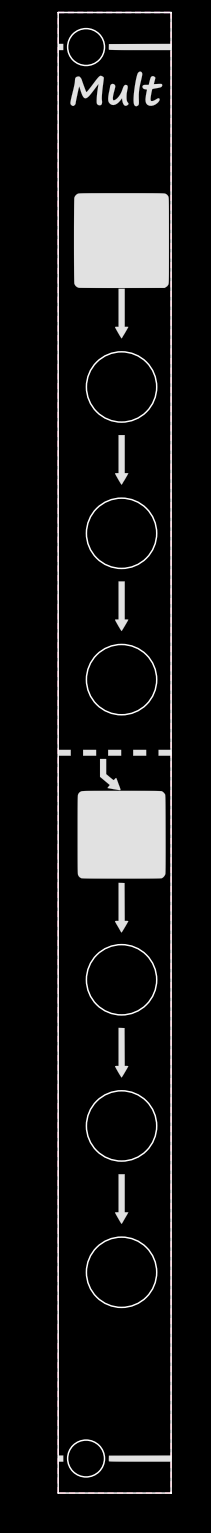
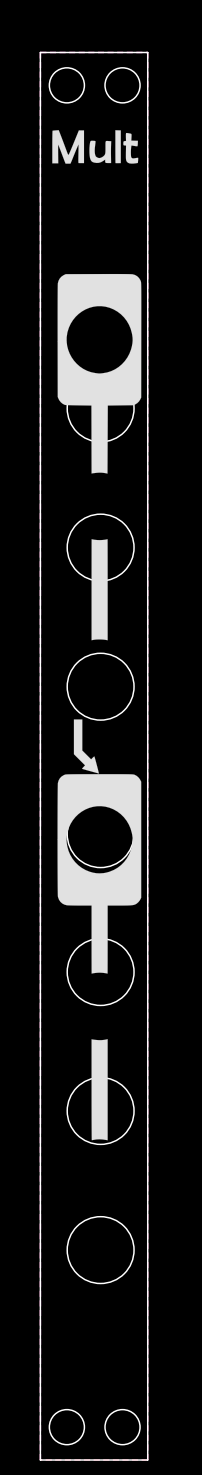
board edge: (58, 12) (58, 1493) (171, 1493) (171, 12) (58, 12) -> none
drawing: [58, 43, 172, 1462] -> none
drawing: none -> [52, 130, 142, 1141]
part: none -> (94, 756)

